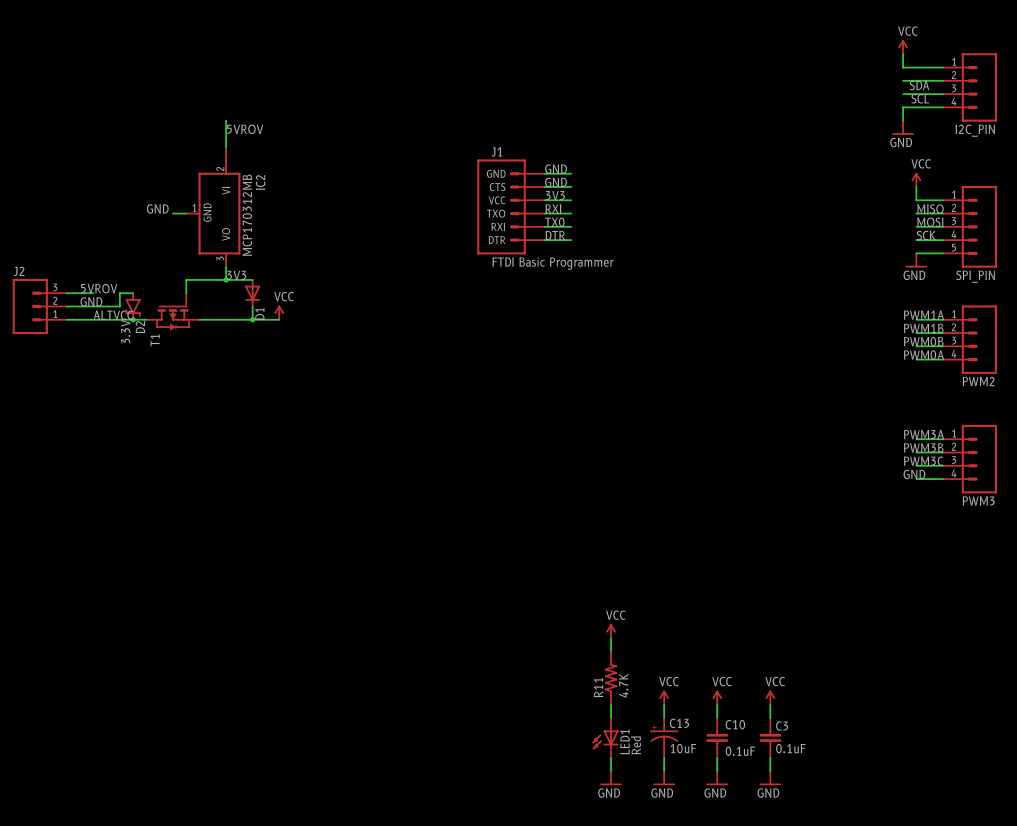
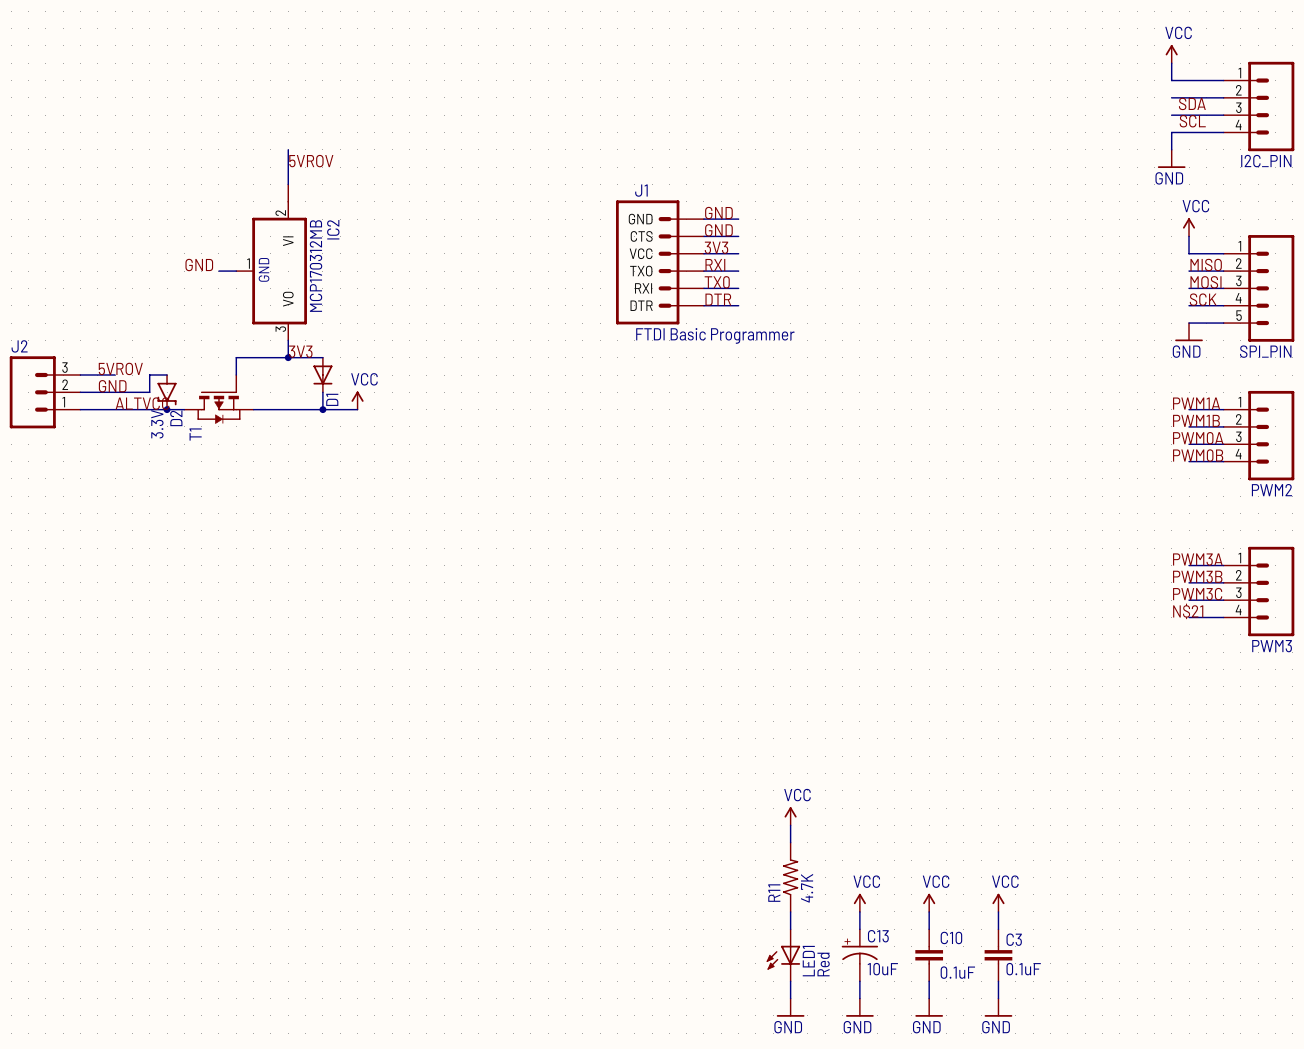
label: PWM0B (923, 341) -> PWM0A (1198, 438)
label: PWM0A (923, 354) -> PWM0B (1198, 455)
label: GND (914, 474) -> N$21 (1188, 611)

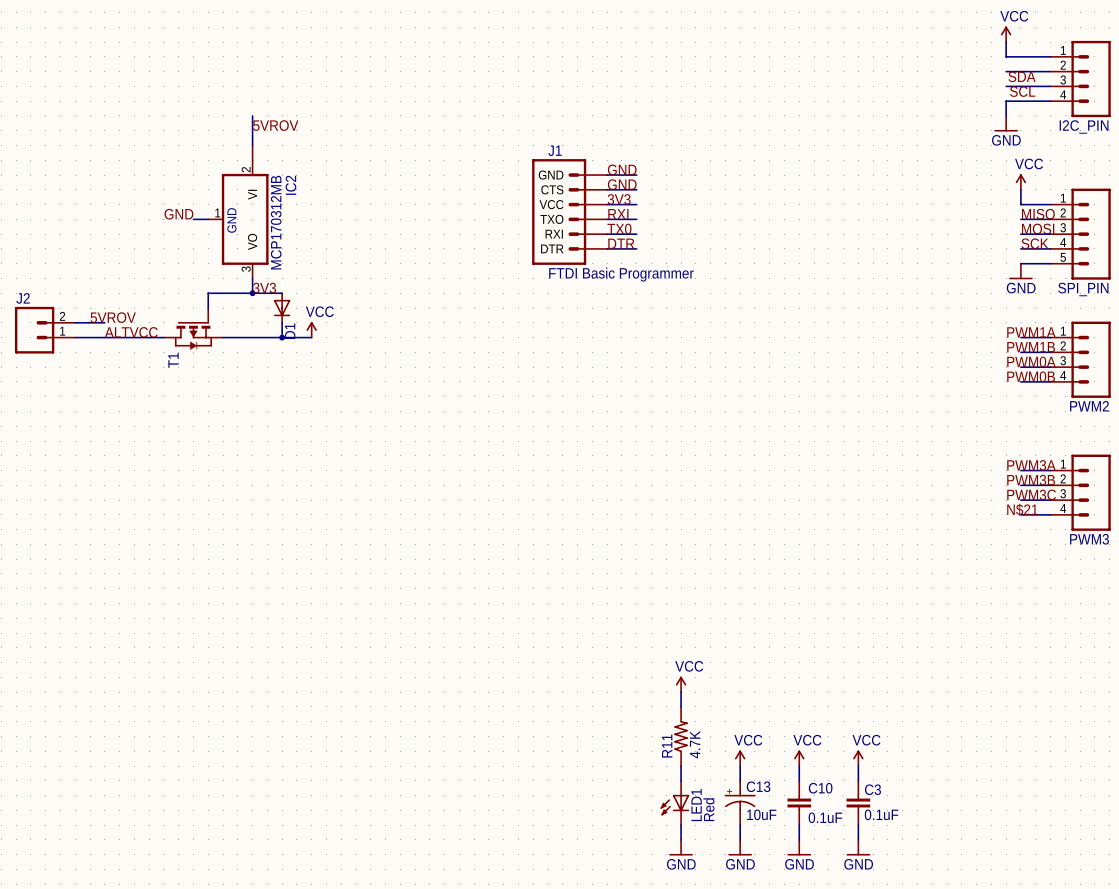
J2 symbol: [9, 356, 81, 429] -> [14, 306, 76, 354]
label: 5VROV (120, 368) -> none
wire: (80, 375) (115, 375) -> none
wire: (167, 375) (149, 375) (149, 392) (115, 392) -> none
label: GND (112, 386) -> 5VROV (113, 317)
D2: 3.3V (167, 392) -> none
junction: (167, 409) -> none

